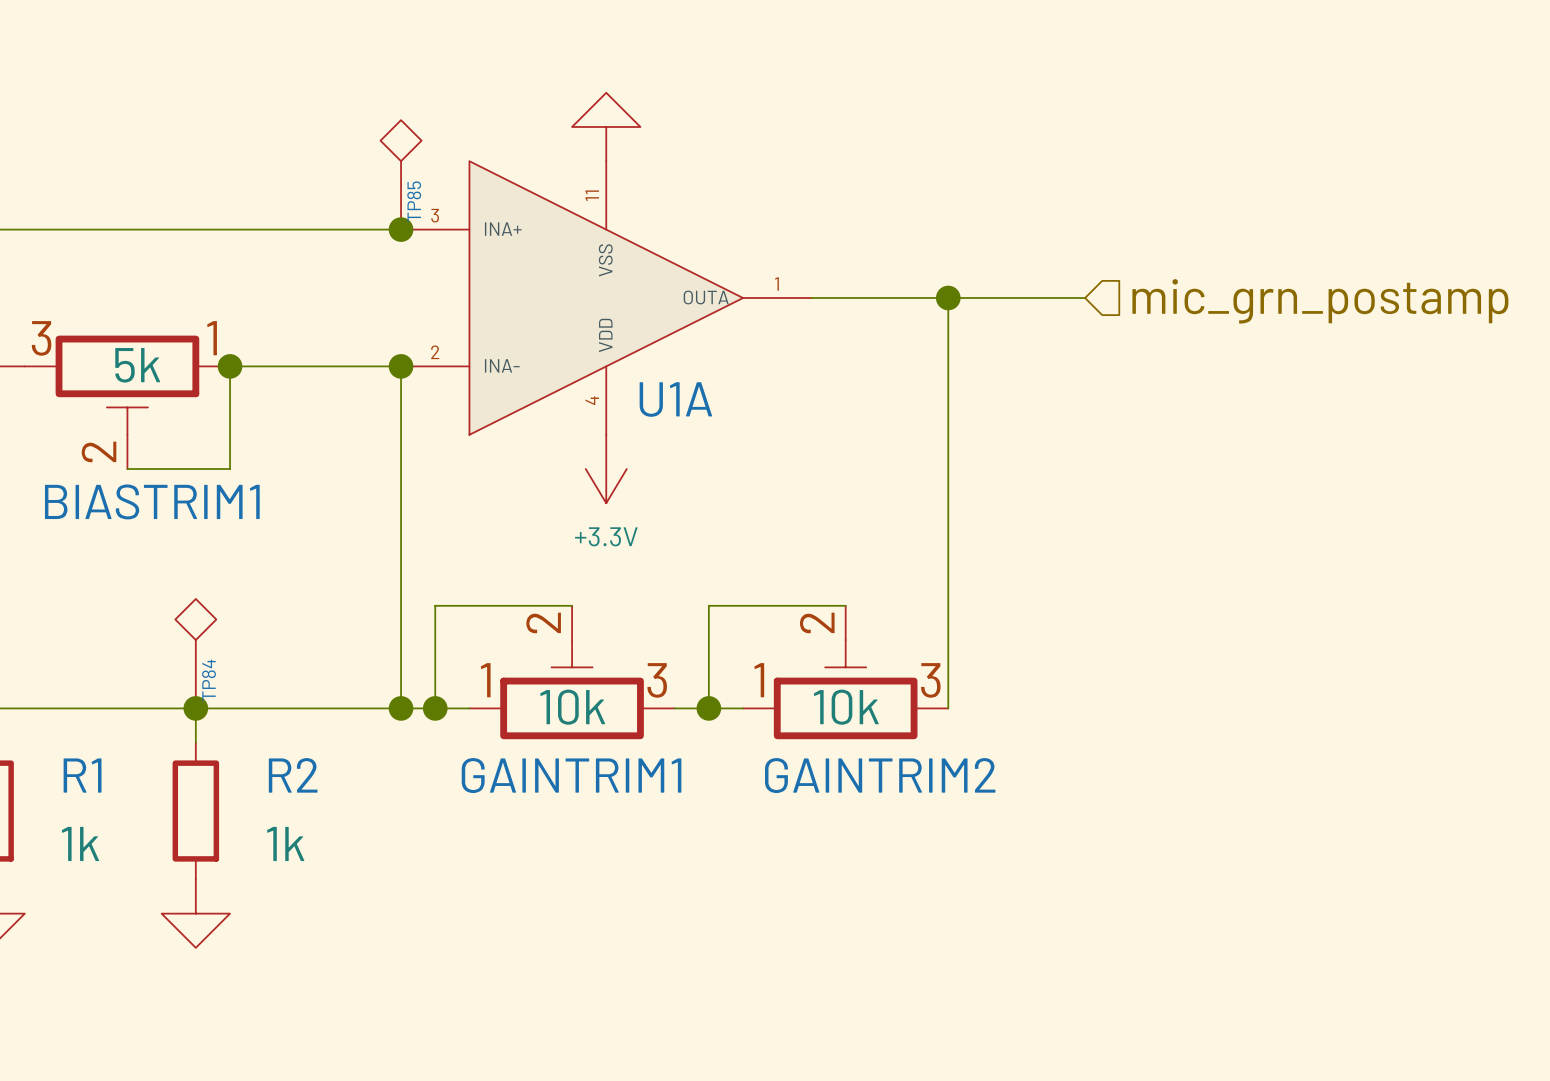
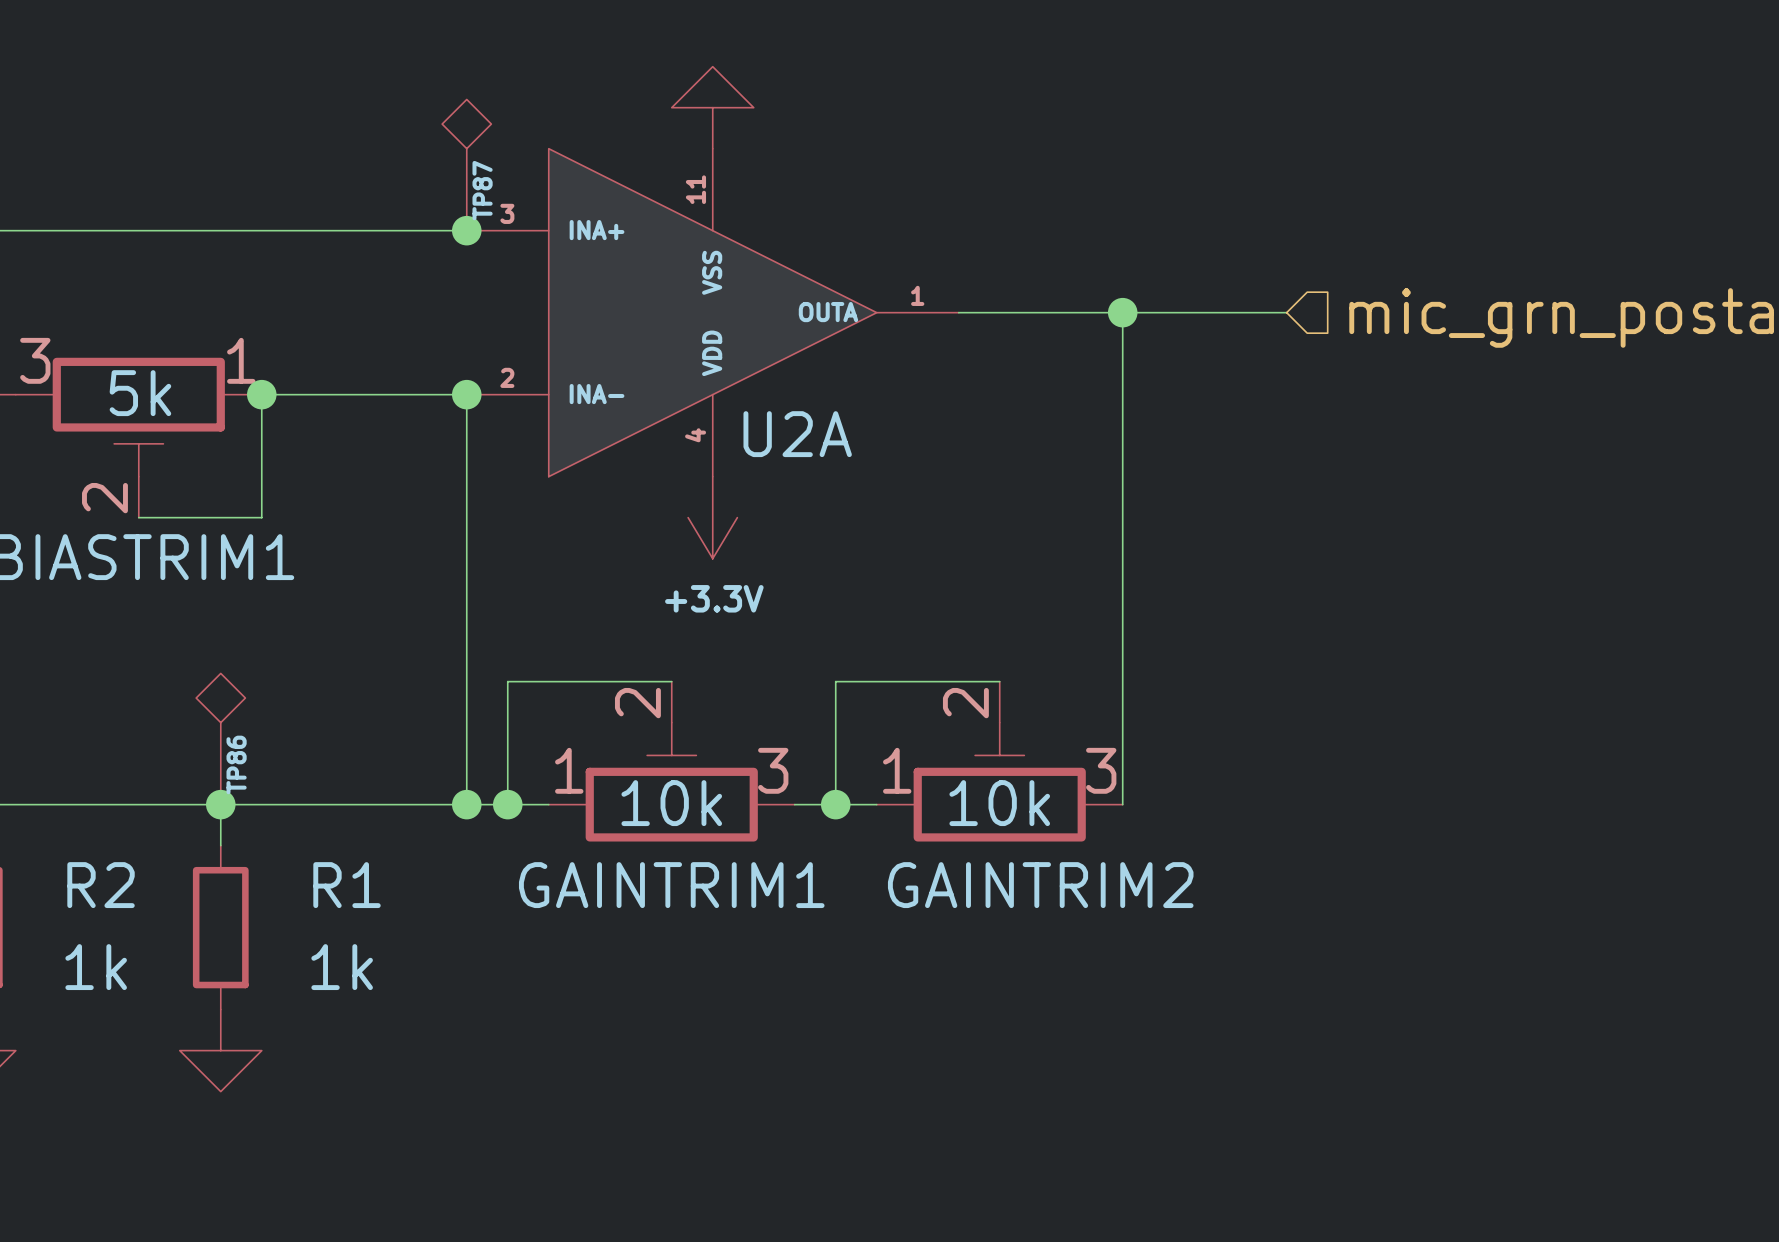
TP85 name: TP85 (414, 201) -> TP87 (482, 190)
U1A name: U1A (675, 399) -> U2A (797, 434)
TP84 name: TP84 (208, 680) -> TP86 (236, 764)
R1 name: R1 (82, 775) -> R2 (101, 885)
R2 name: R2 (293, 775) -> R1 (347, 885)

